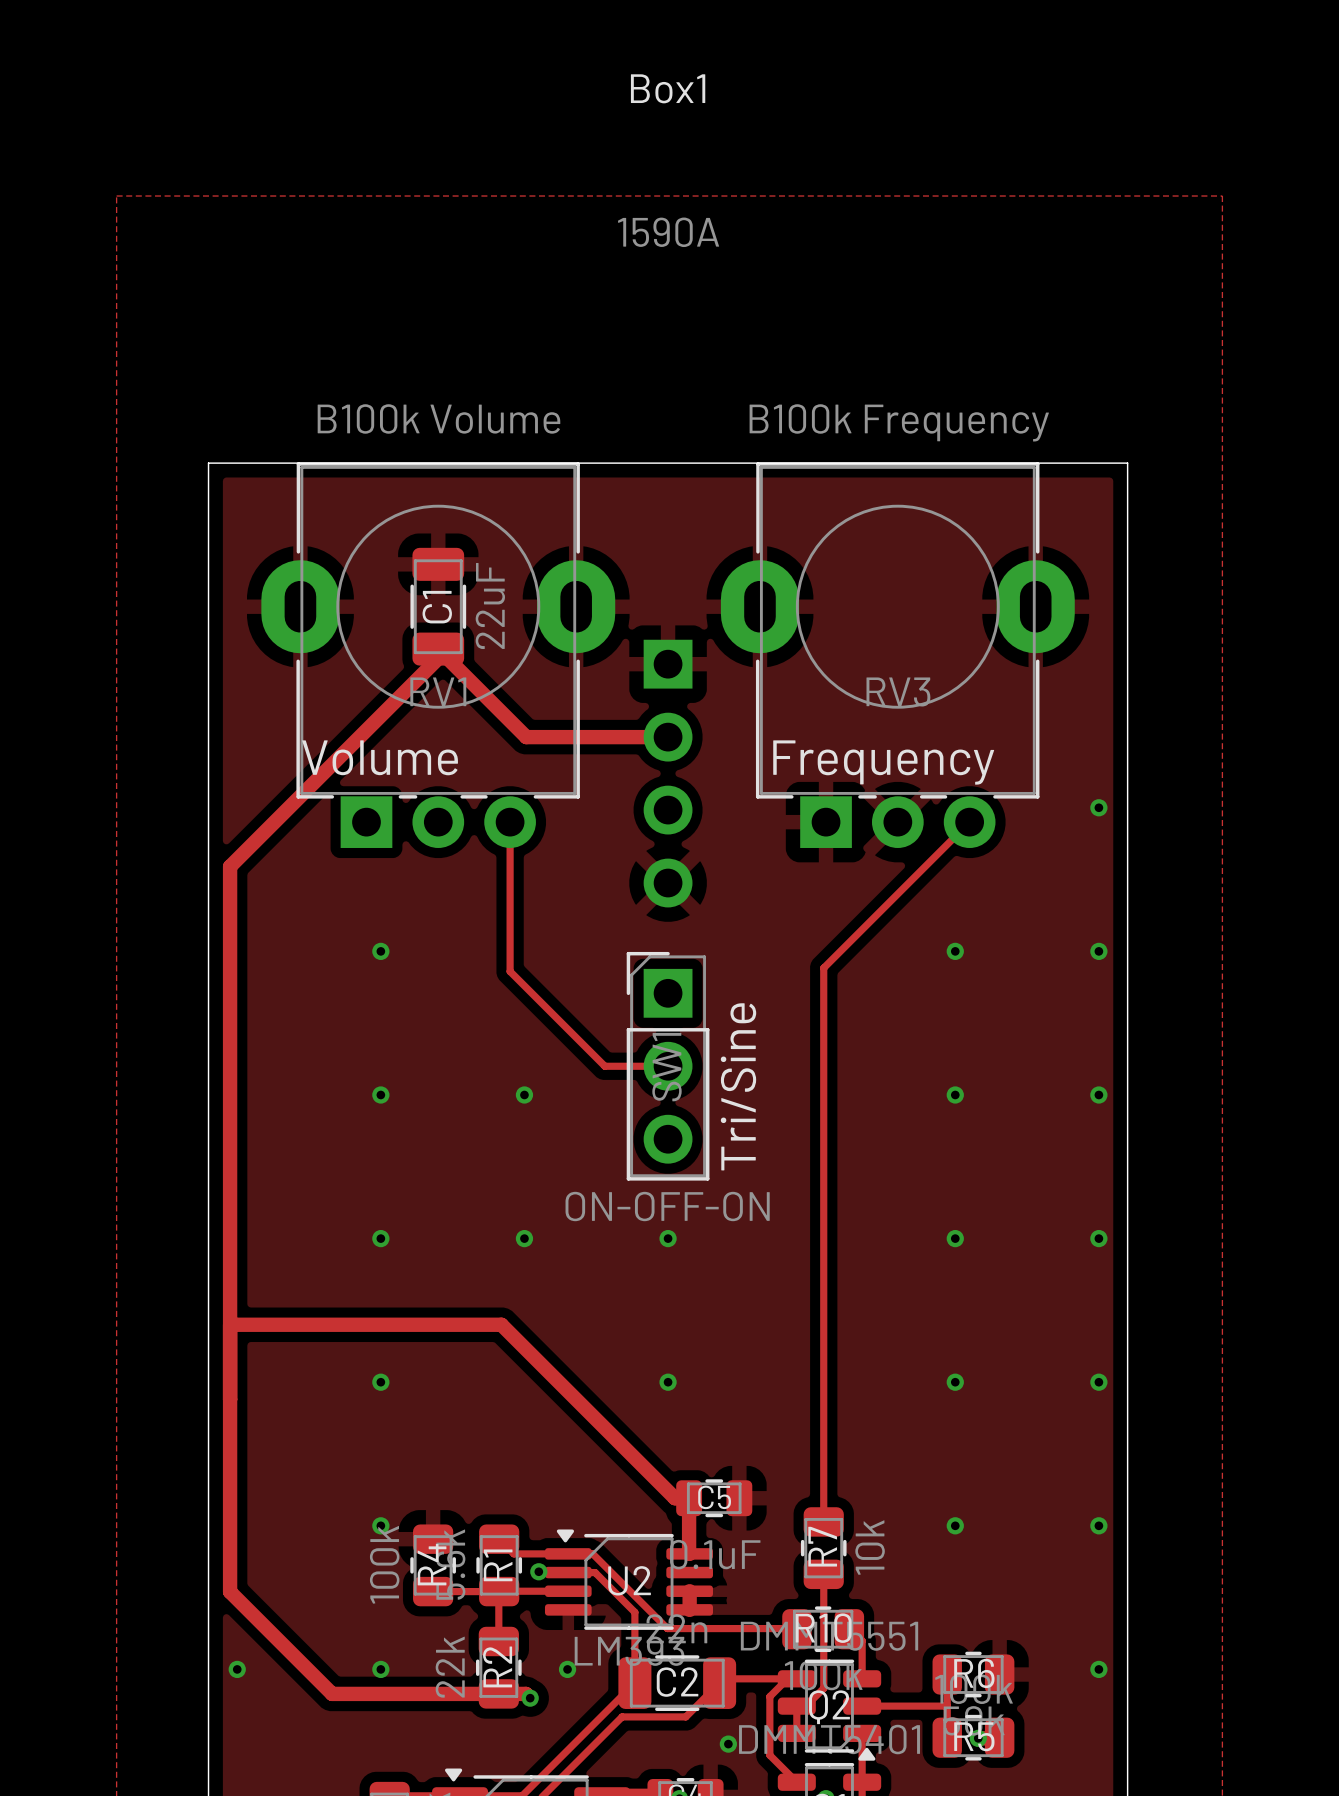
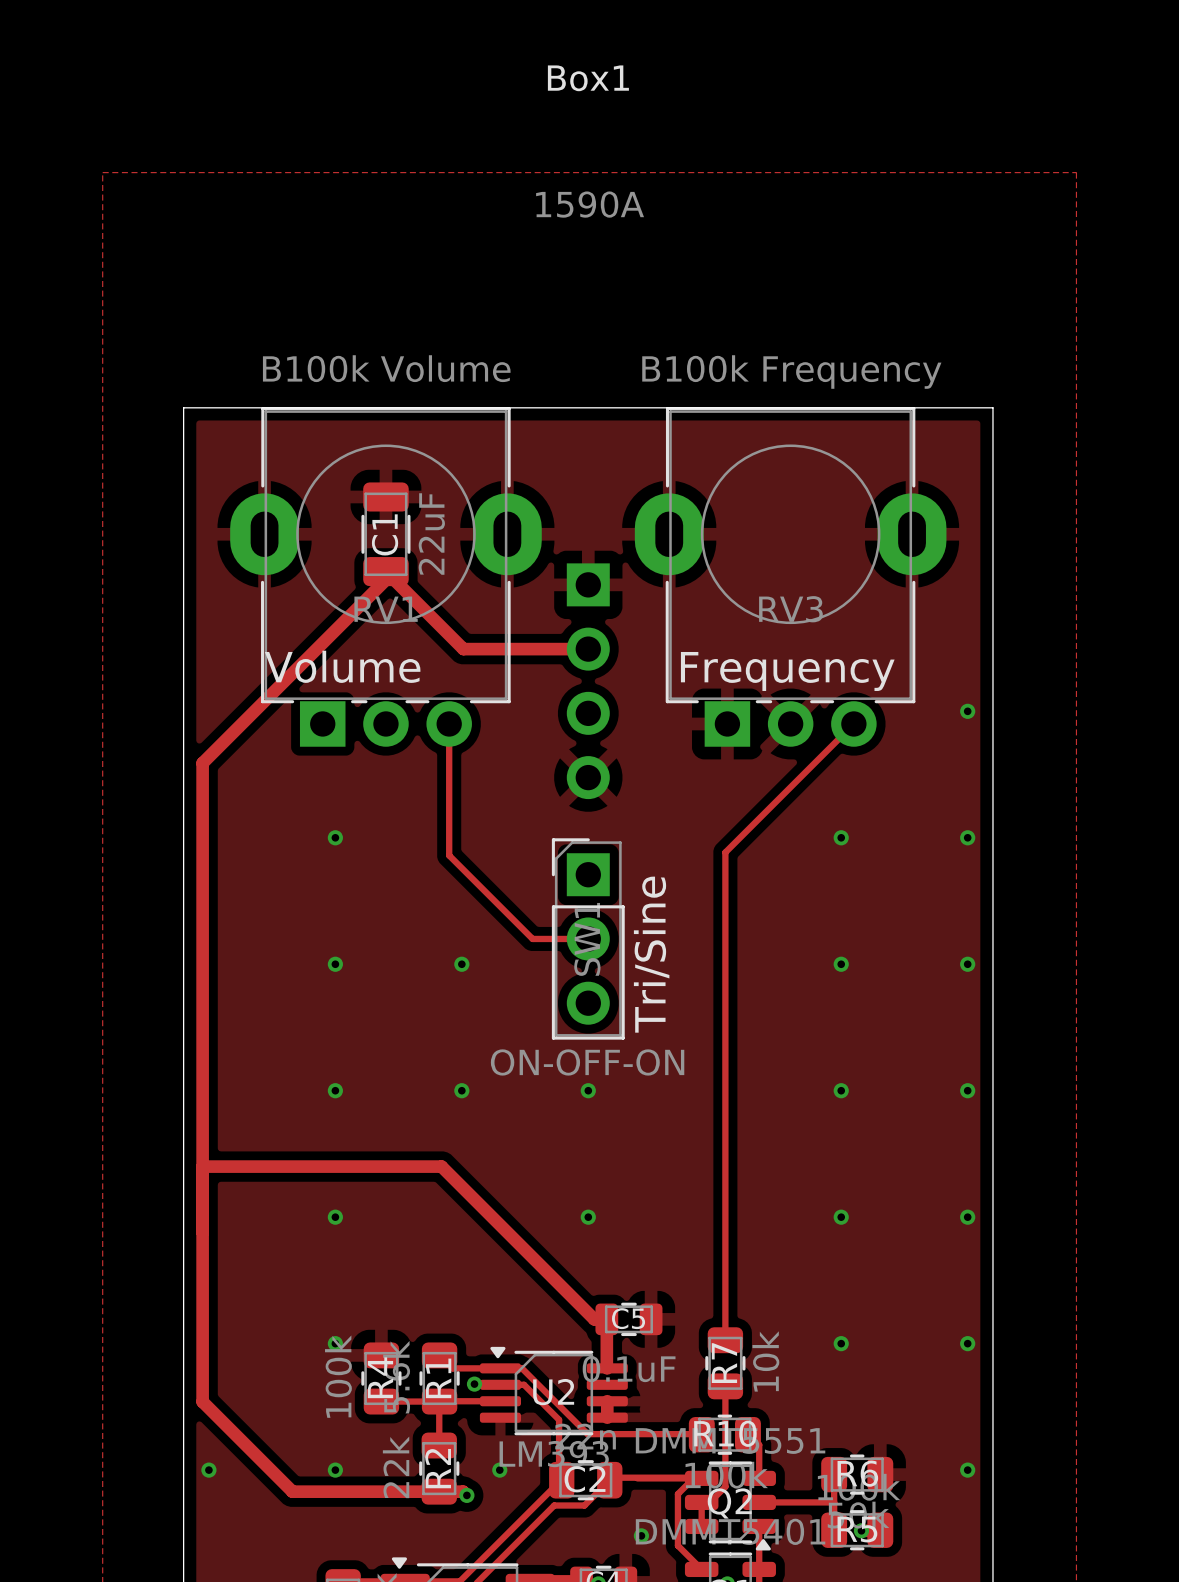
C2 footprint: [618, 1655, 737, 1712] -> [549, 1460, 623, 1501]
track: (719, 1683) (685, 1716) (622, 1716) -> (701, 1478) (612, 1477) (584, 1505) (554, 1505) (547, 1511)

